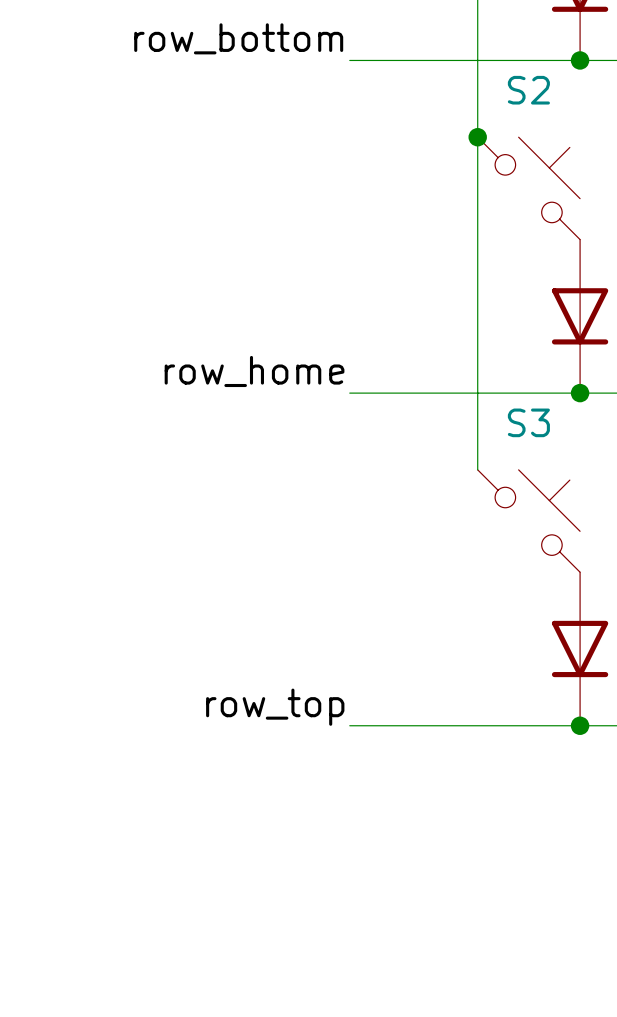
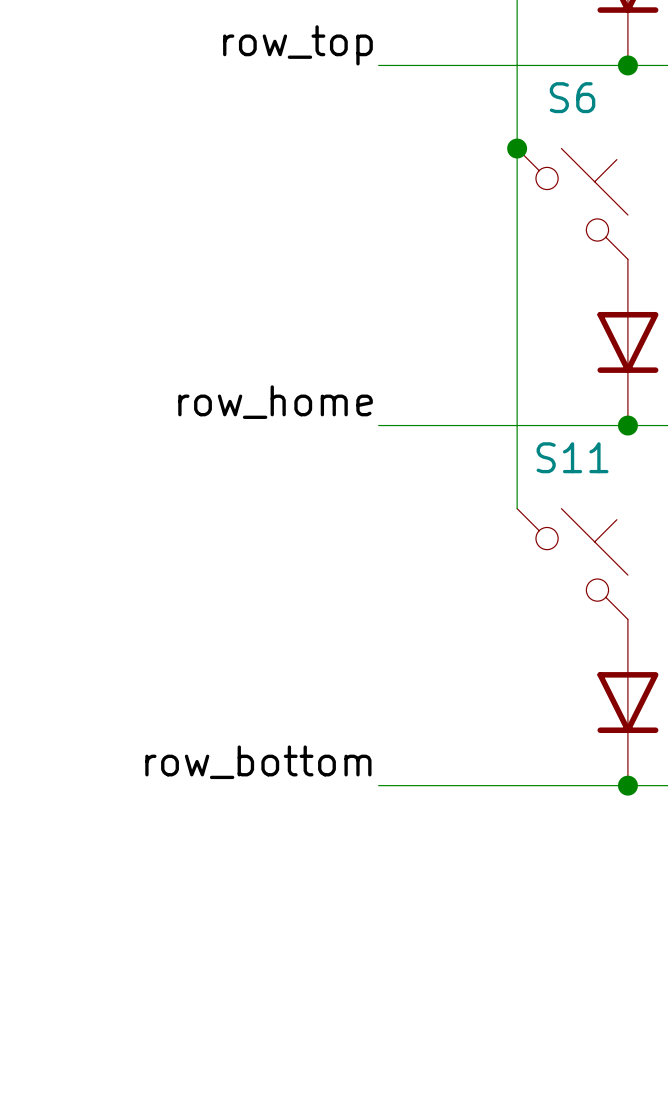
label: row_bottom (238, 38) -> row_top (297, 45)
S2 name: S2 (528, 90) -> S6 (572, 97)
S3 name: S3 (528, 422) -> S11 (572, 457)
label: row_top (275, 707) -> row_bottom (258, 762)

